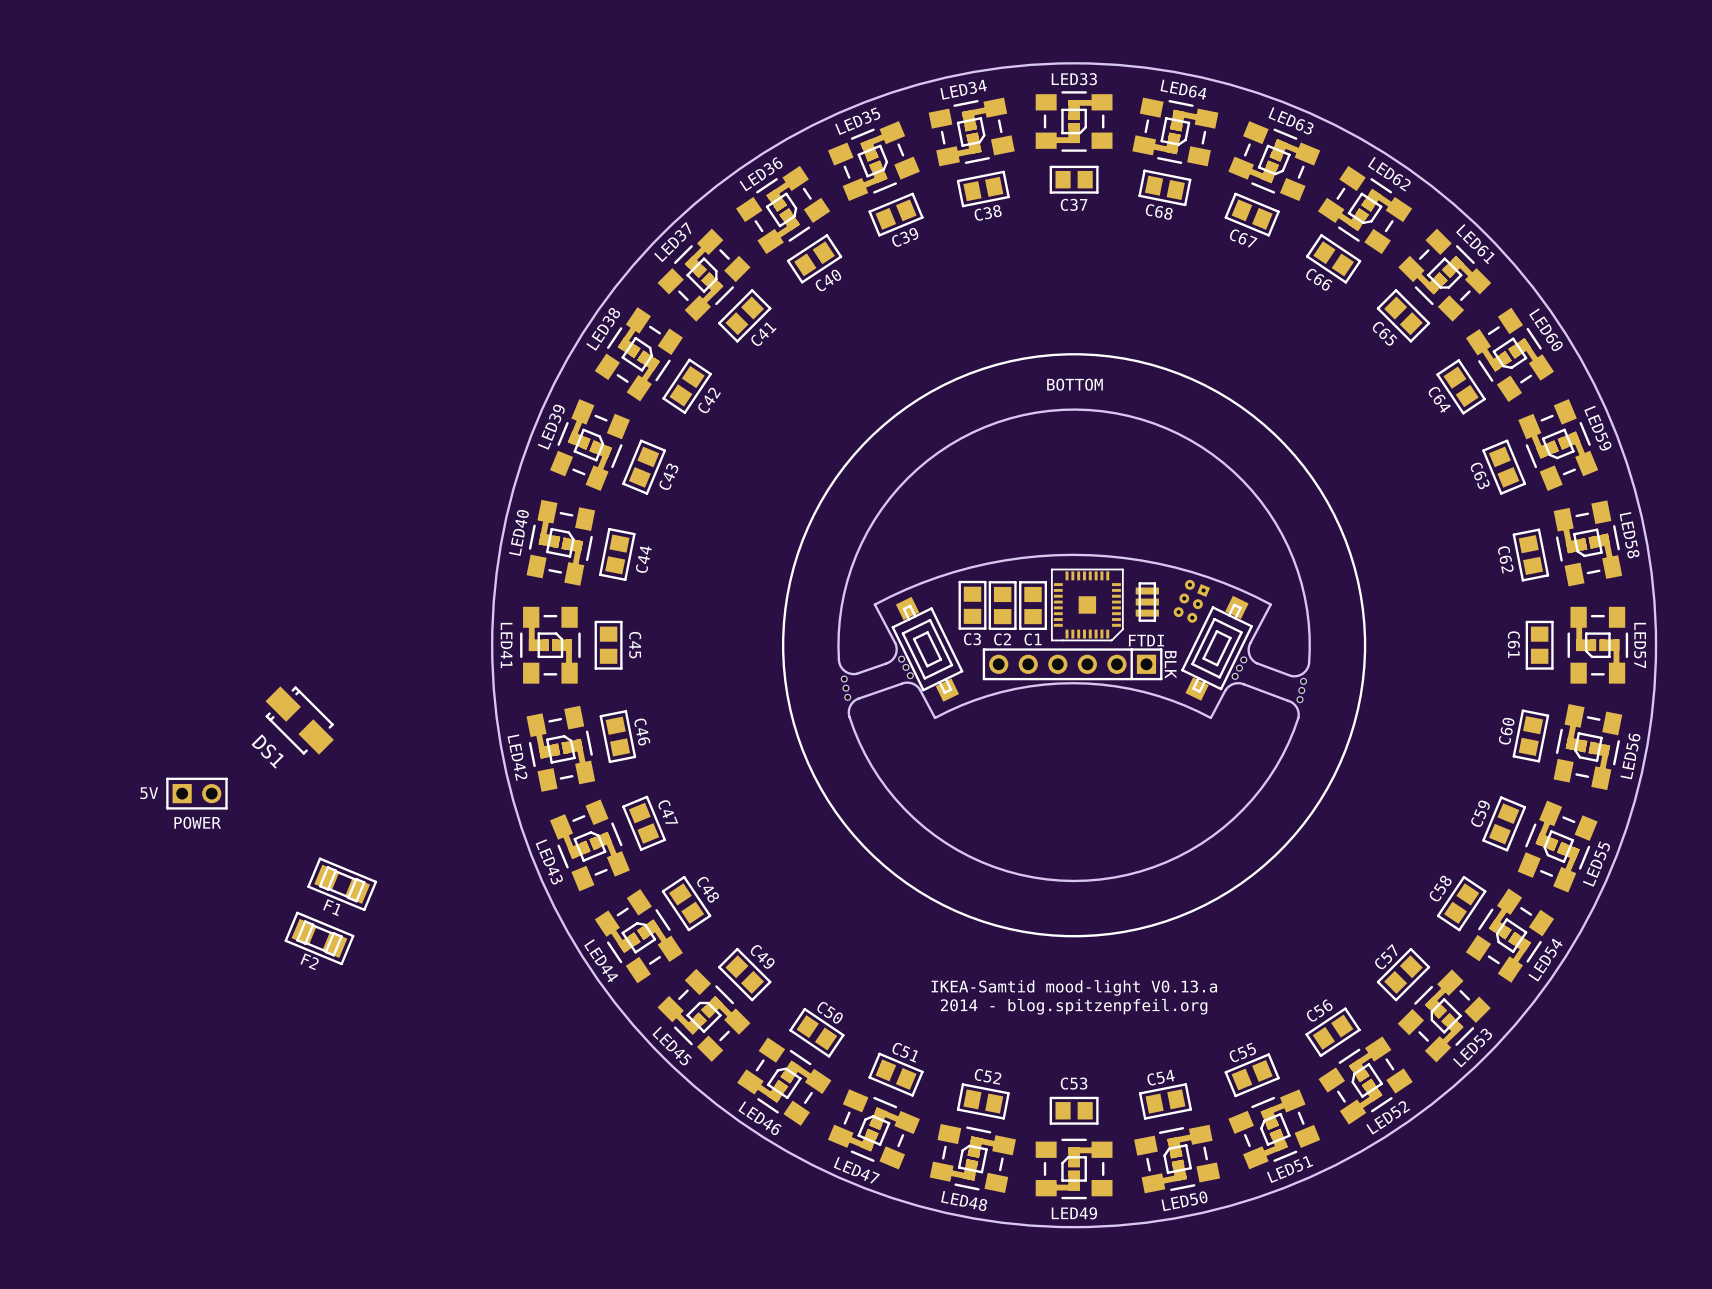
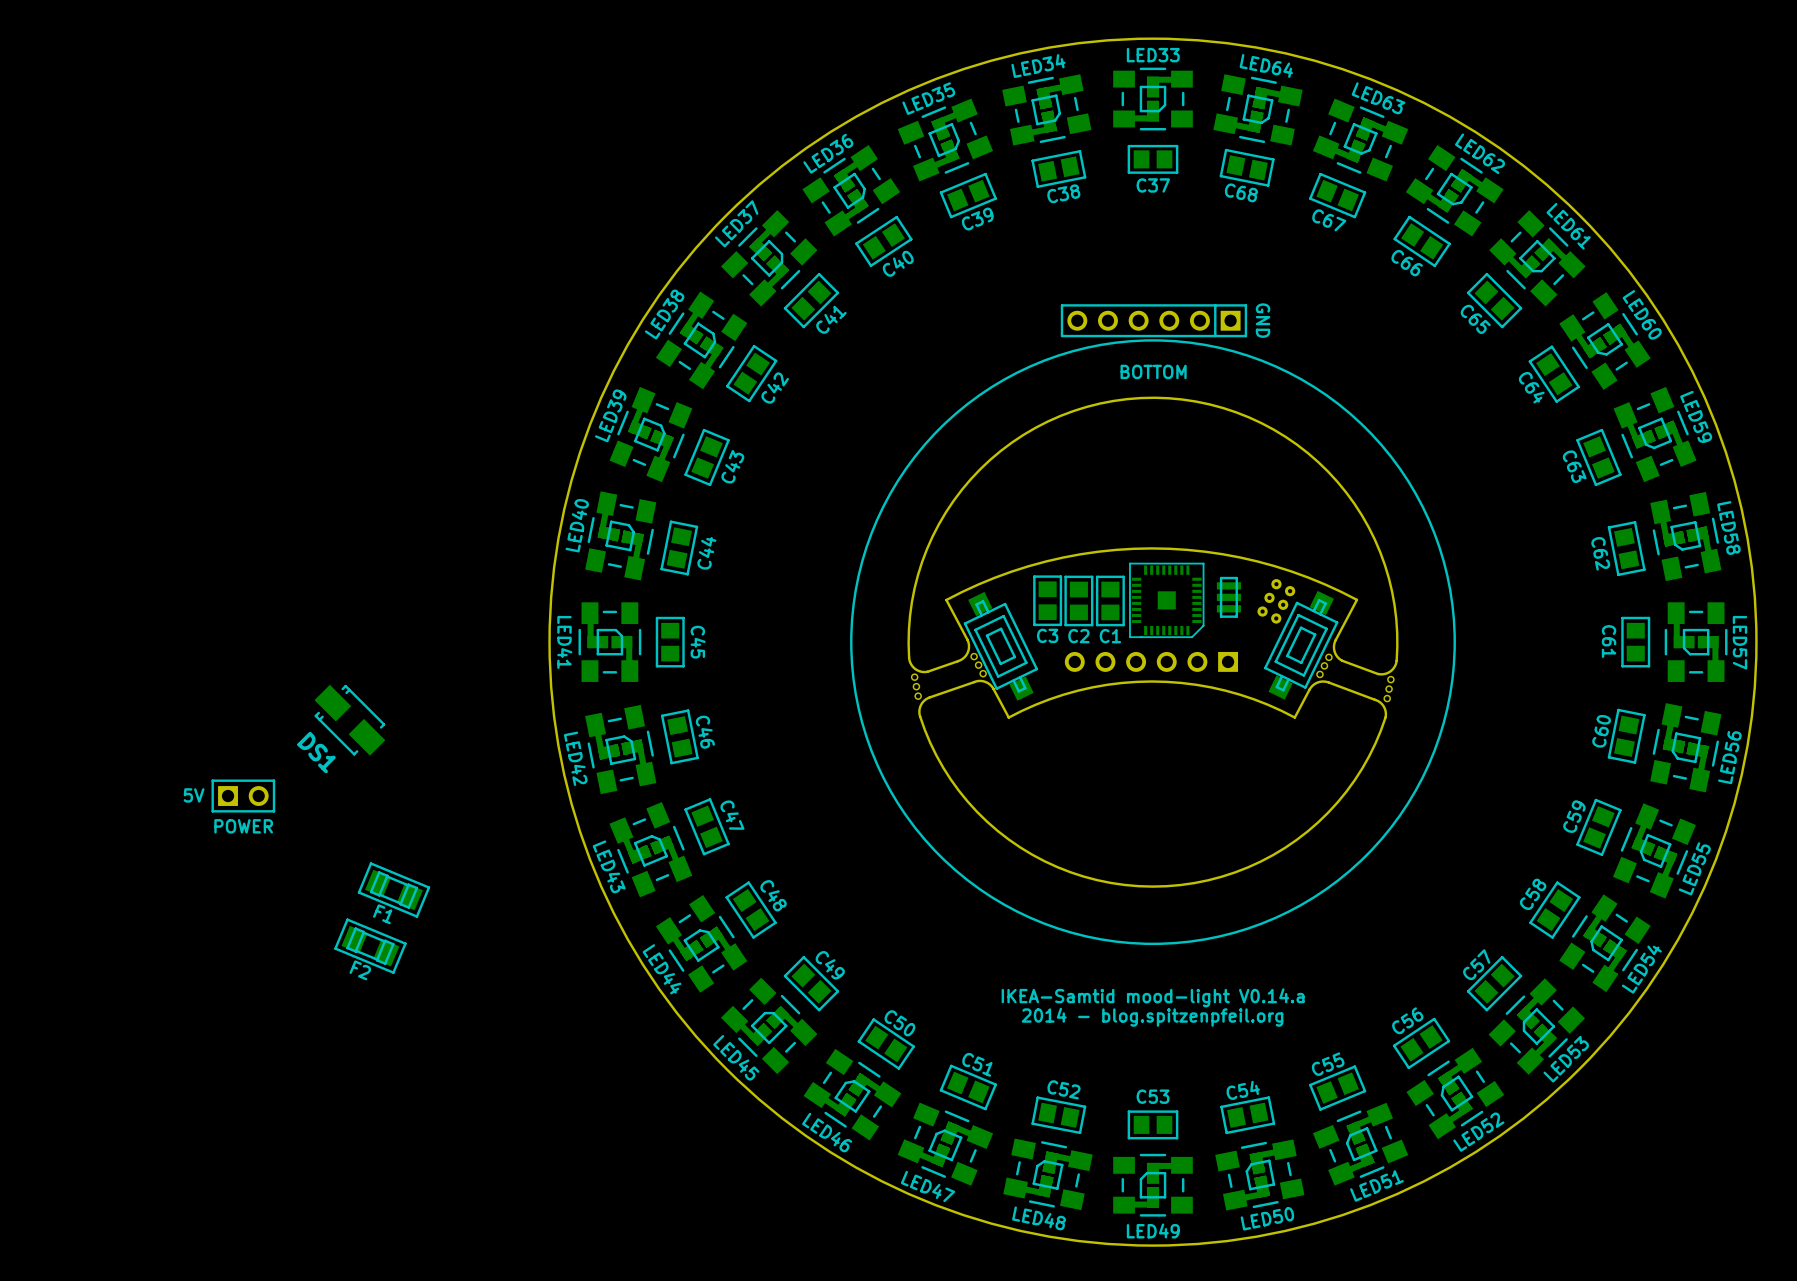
part: none -> (1153, 320)
text: none -> GND (1263, 320)
part footprint: [1173, 579, 1211, 623] -> [1257, 579, 1296, 624]
part side: bottom (1072, 664) -> top (1151, 661)
text: BLK (1170, 664) -> none
text: IKEA-Samtid mood-light V0.13.a (1074, 987) -> IKEA-Samtid mood-light V0.14.a (1153, 997)

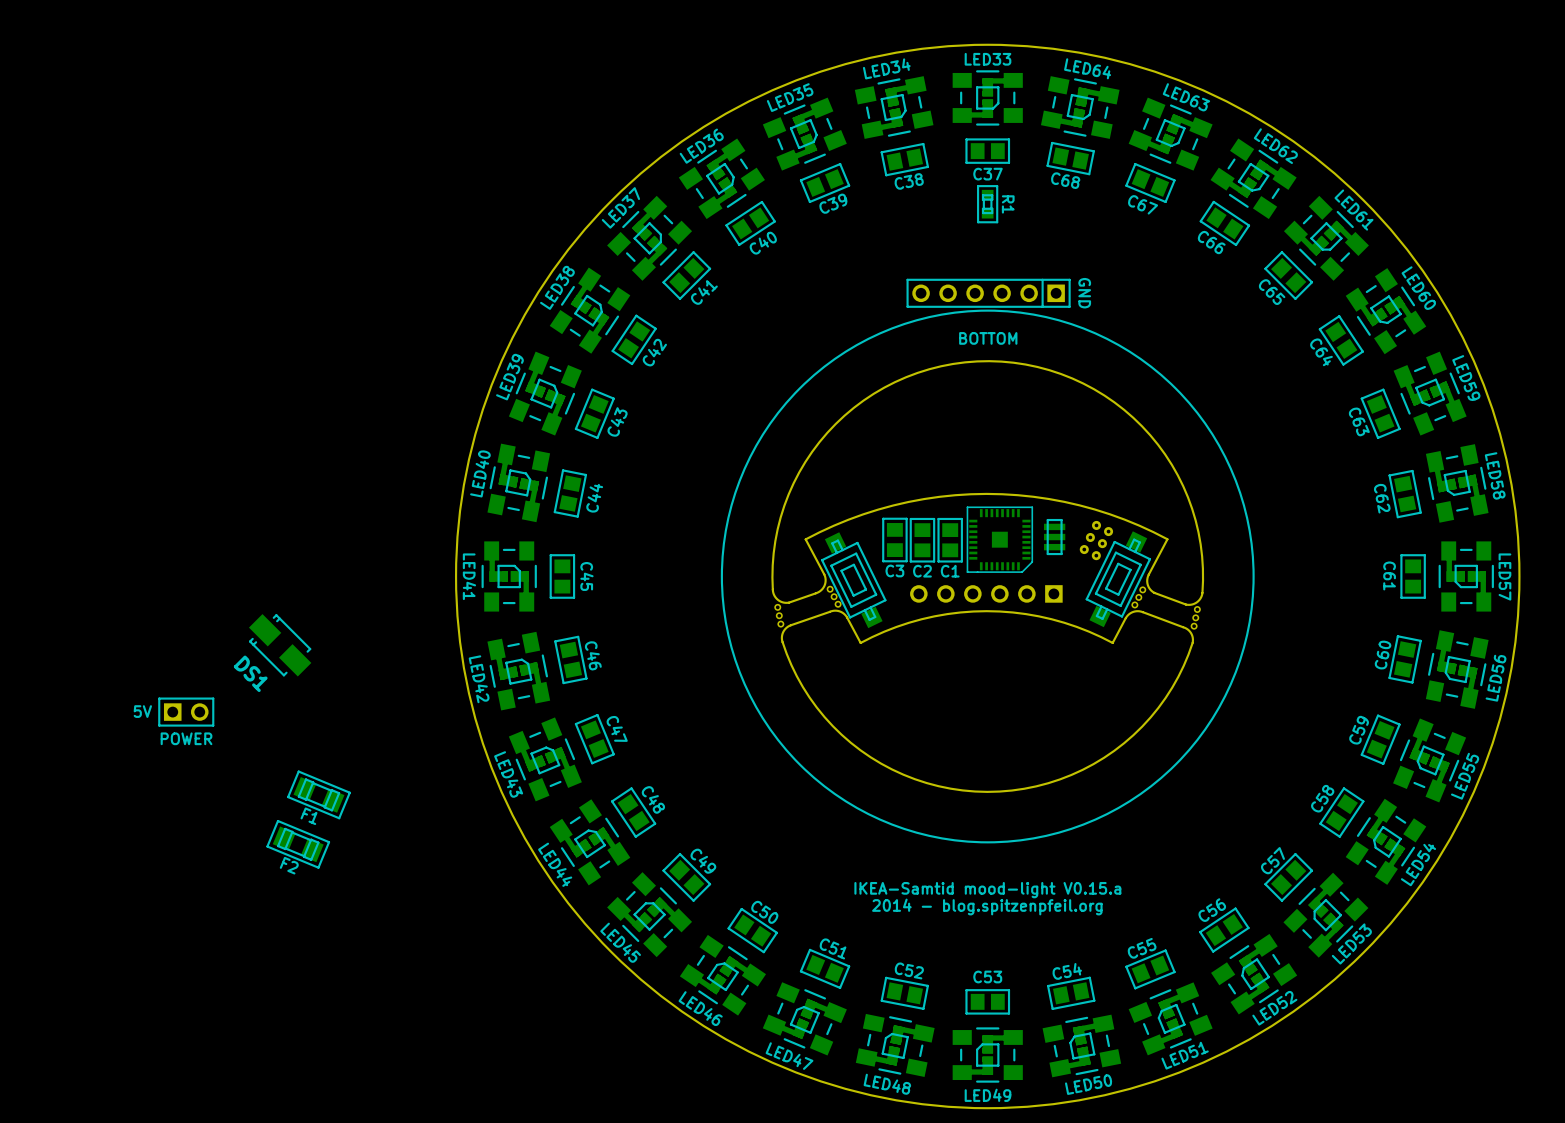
R1: none -> (987, 204)
text: IKEA-Samtid mood-light V0.14.a (1153, 997) -> IKEA-Samtid mood-light V0.15.a (987, 890)

